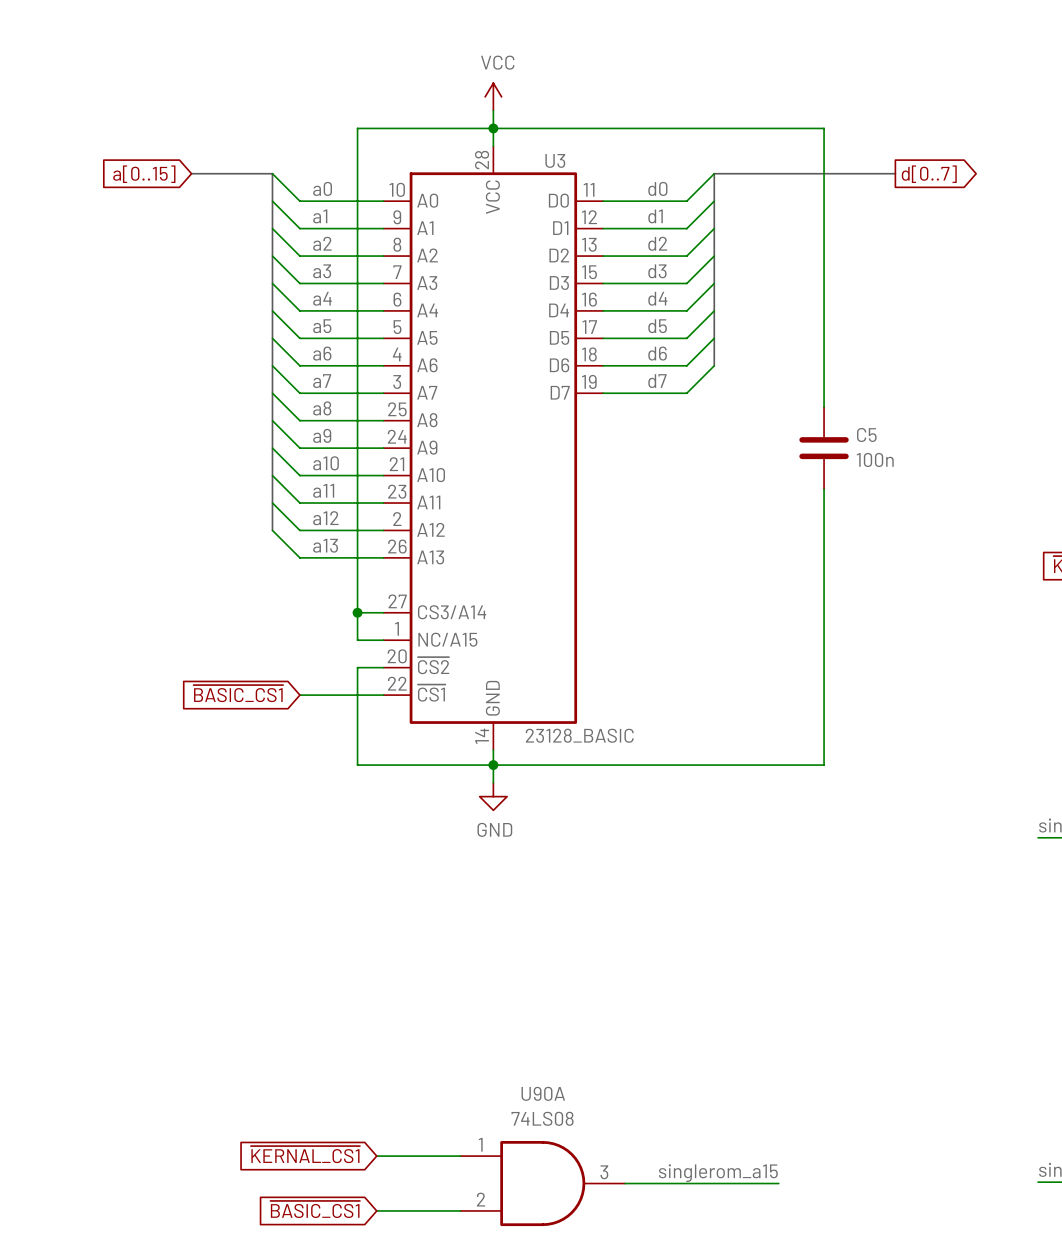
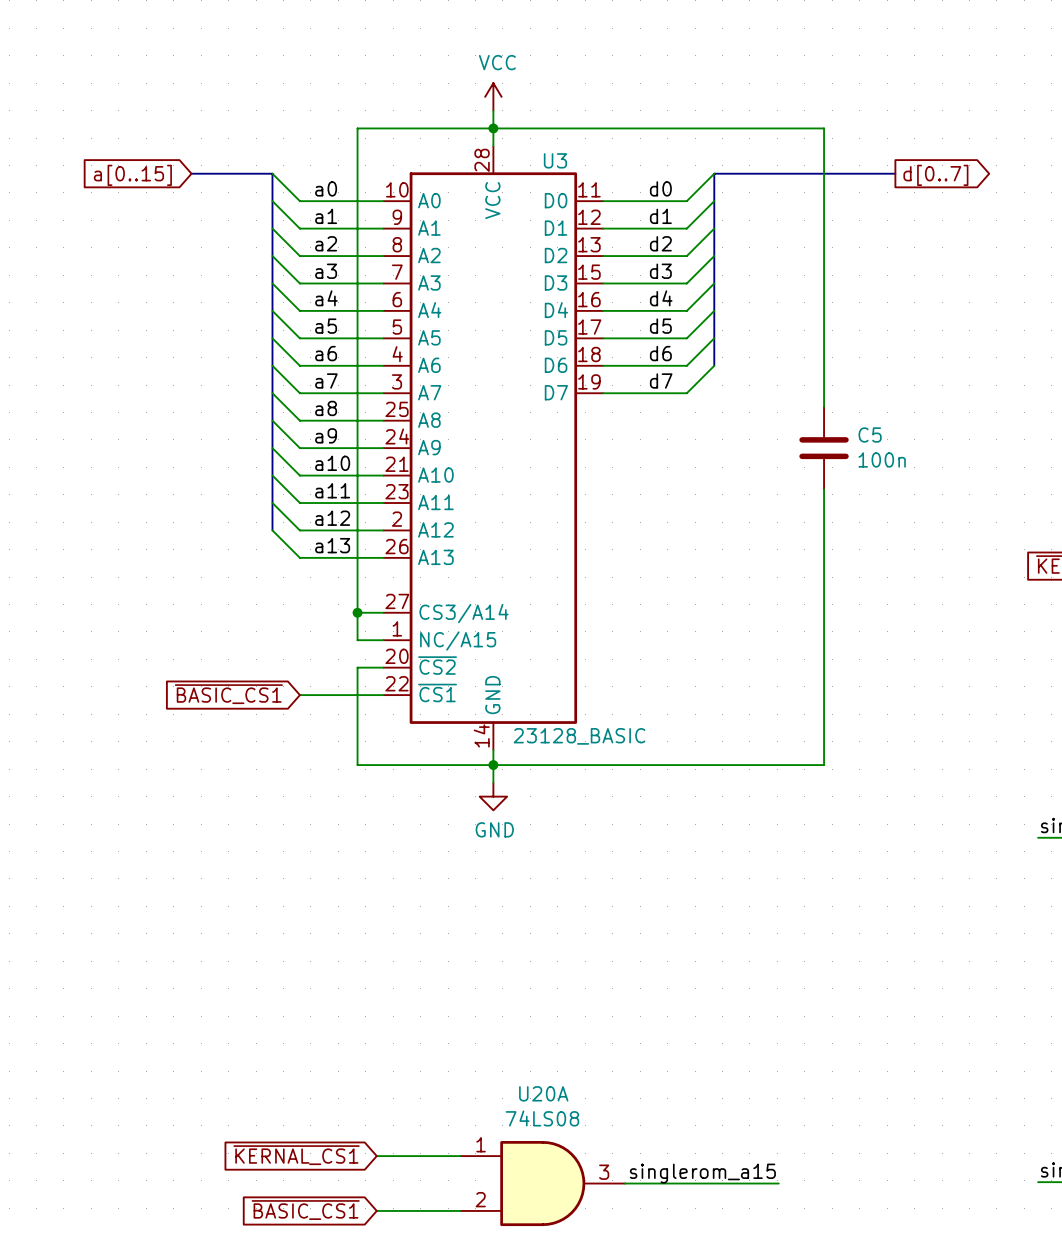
U90A name: U90A (543, 1093) -> U20A (543, 1093)

